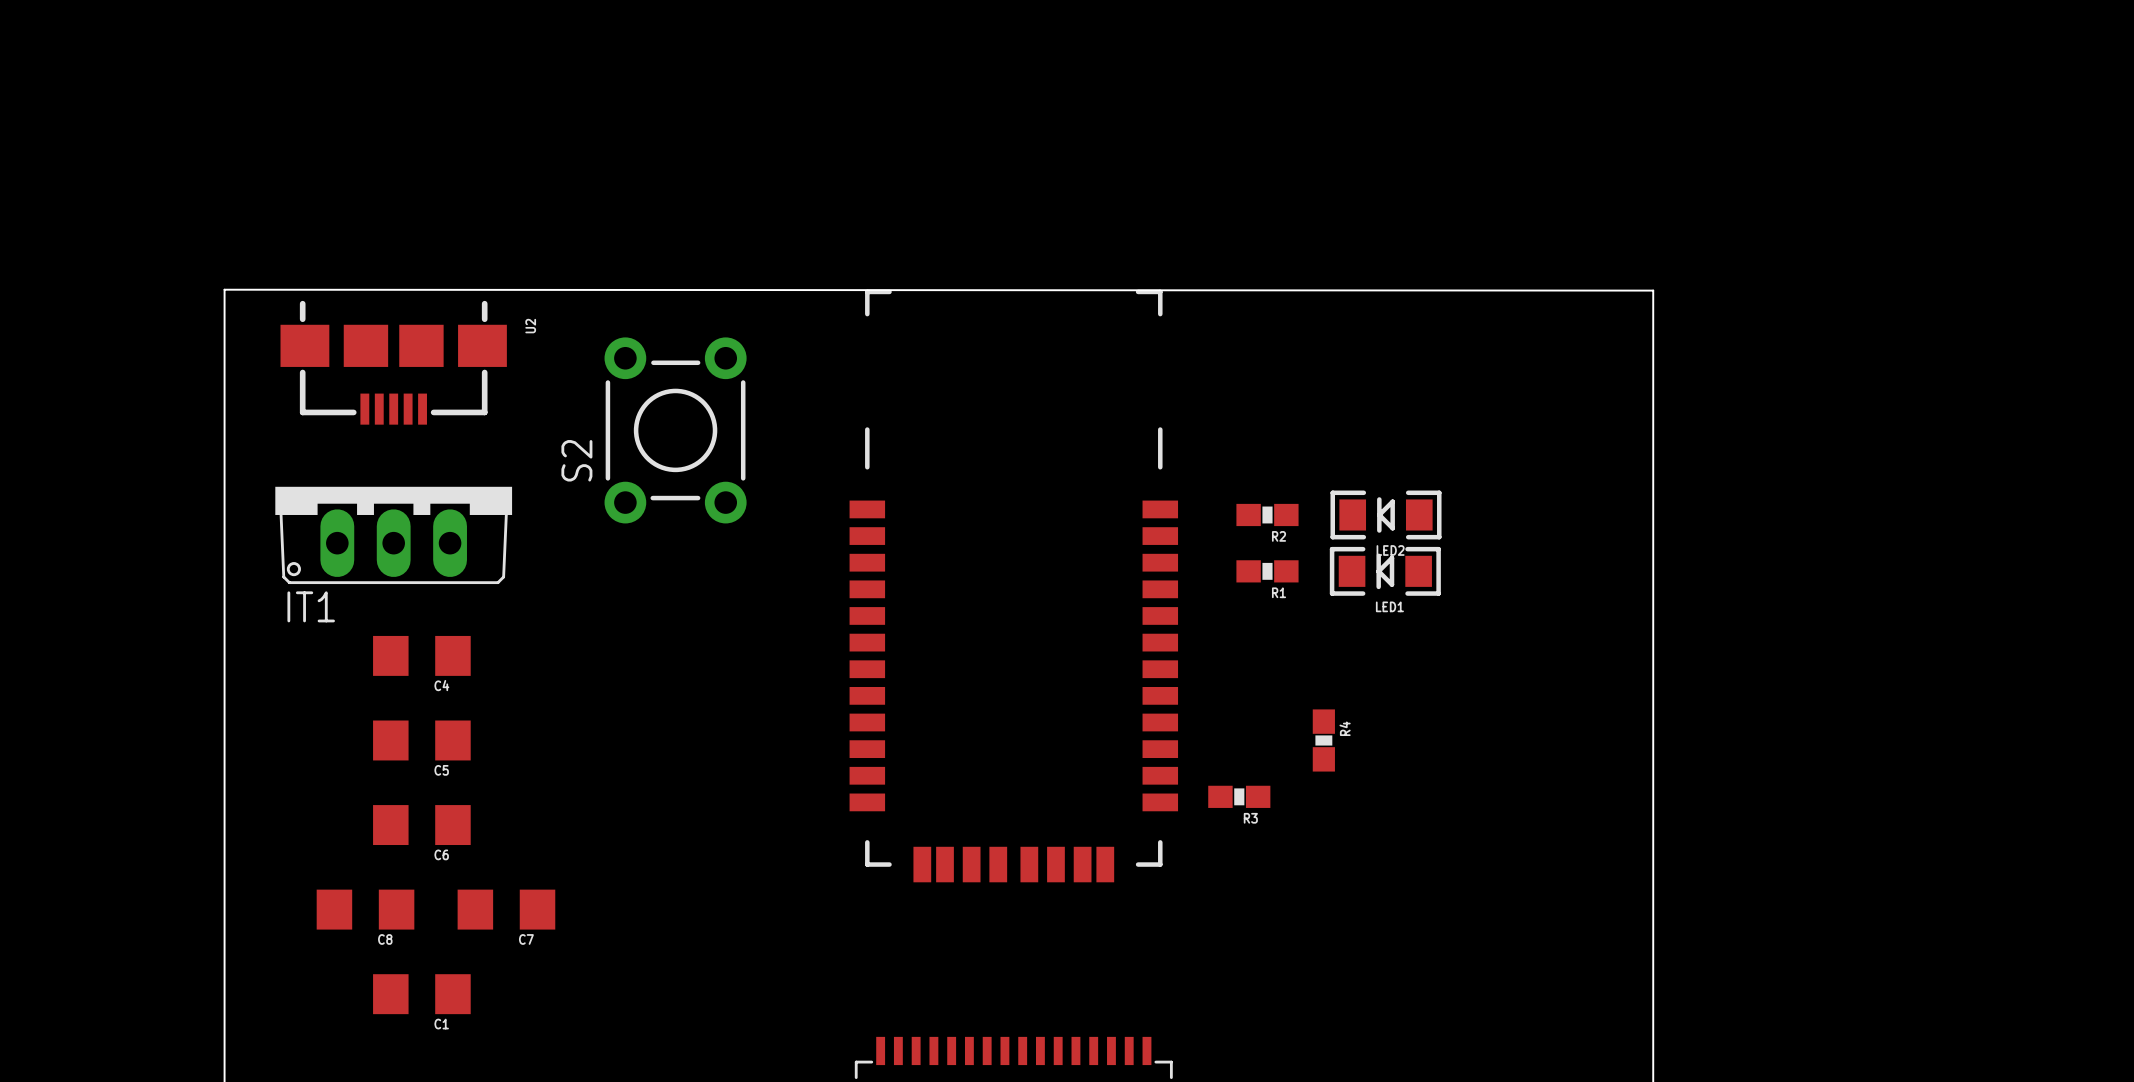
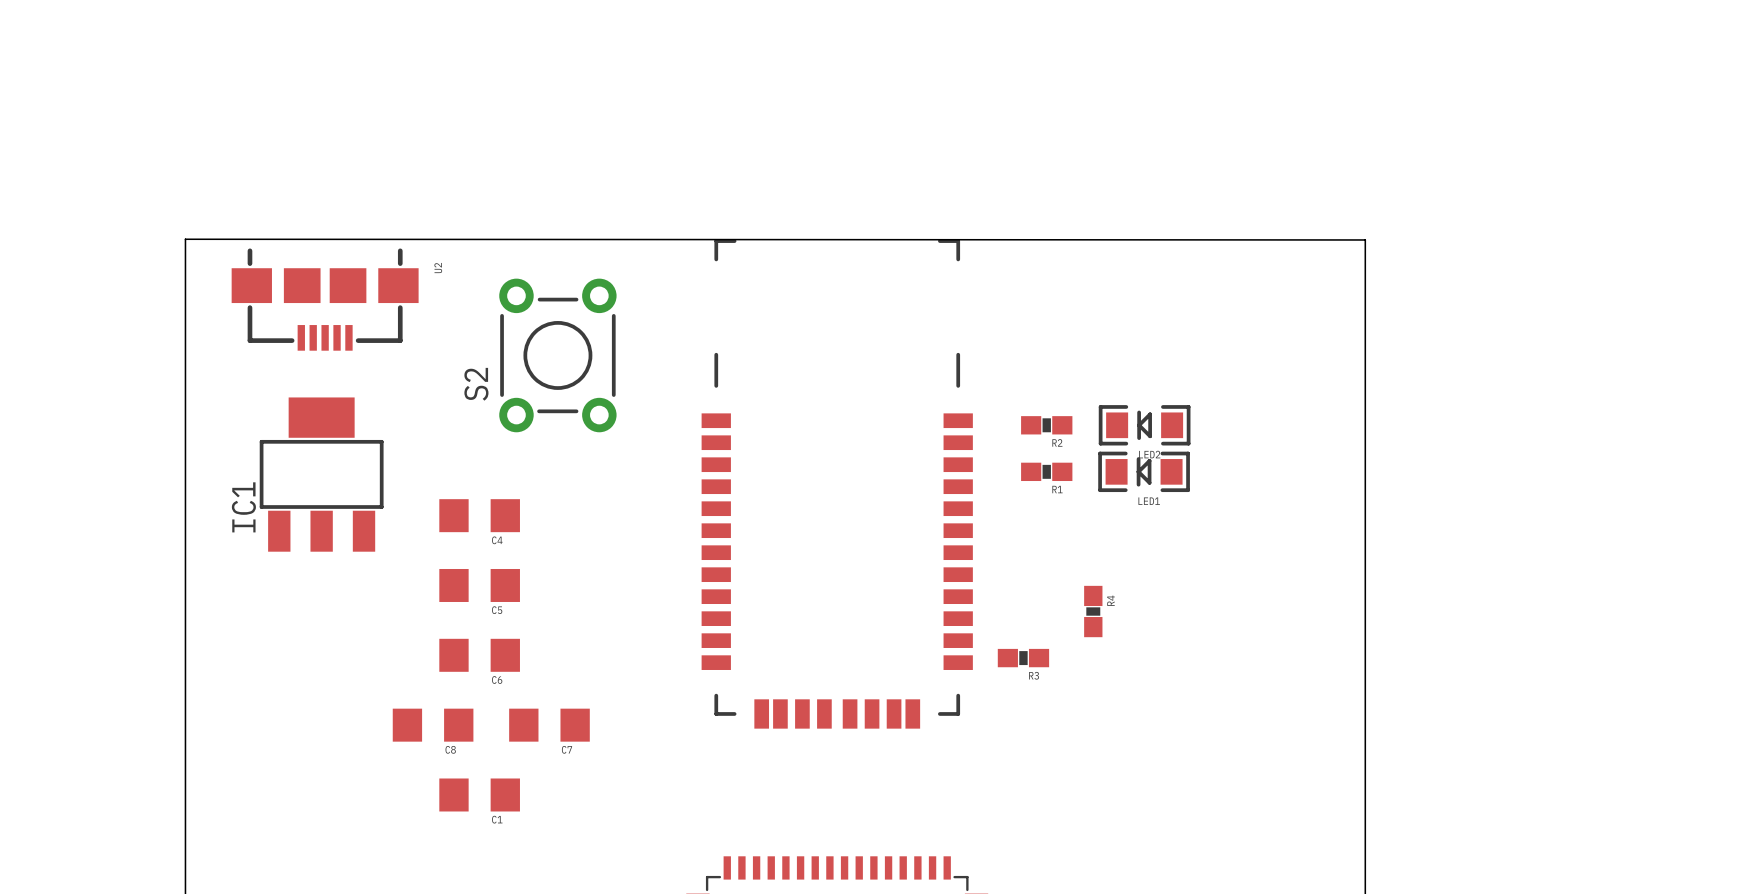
IT1: (393, 535) -> none
IC1: none -> (321, 474)
C4 position: (421, 655) -> (479, 515)
C5 position: (421, 740) -> (479, 585)
C6 position: (421, 825) -> (479, 655)
C8 position: (365, 909) -> (433, 725)
C7 position: (506, 909) -> (549, 725)
C1 position: (421, 994) -> (479, 794)

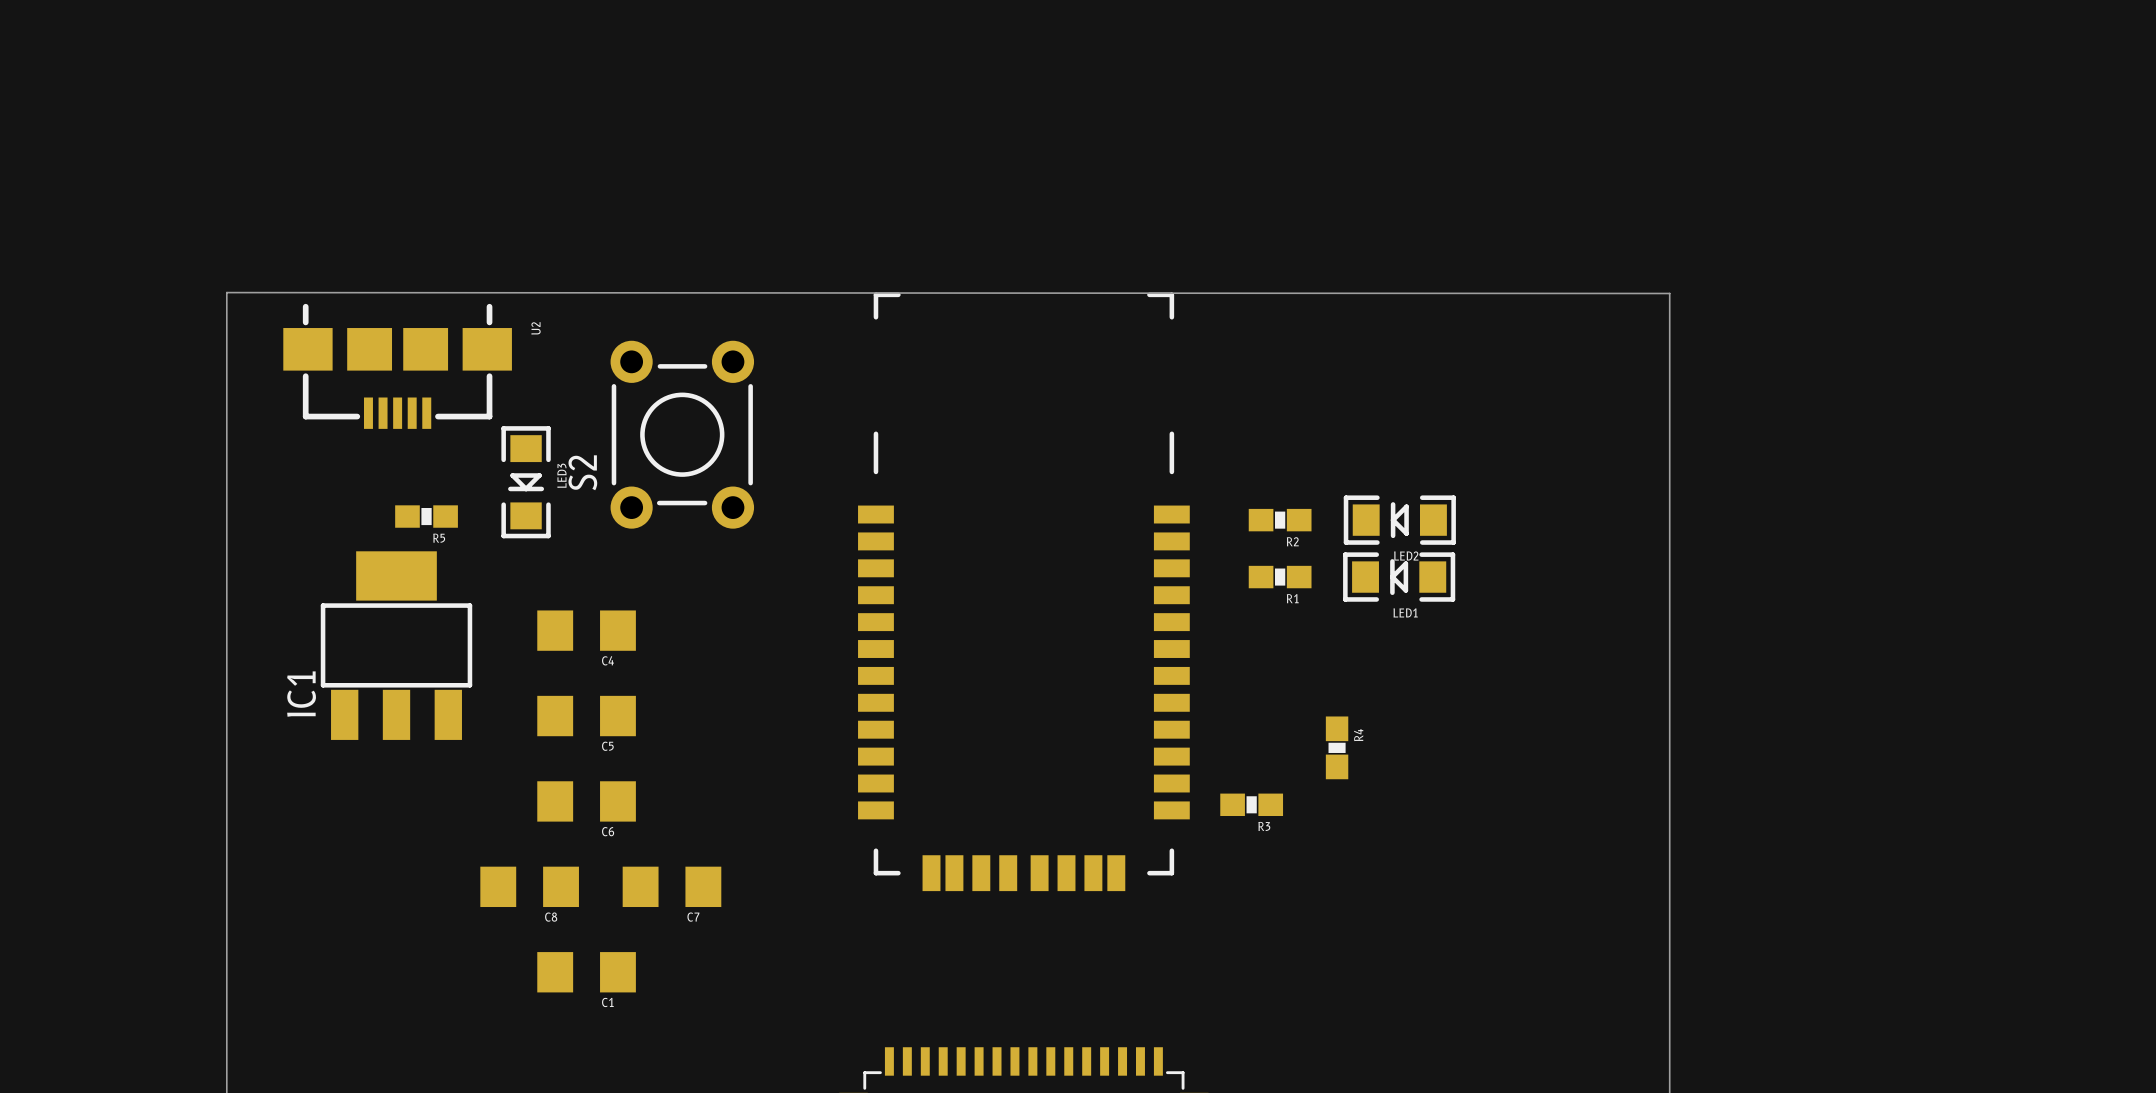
LED3: none -> (526, 482)
R5: none -> (426, 516)
IC1 position: (321, 474) -> (396, 645)

